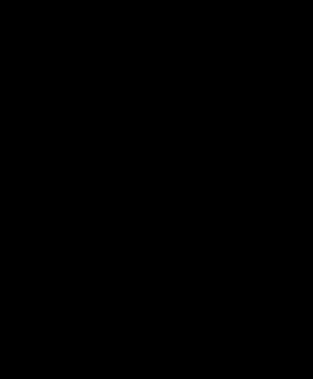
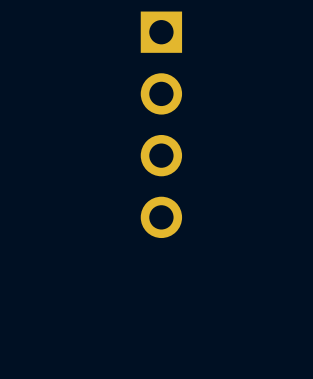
part: none -> (161, 124)

